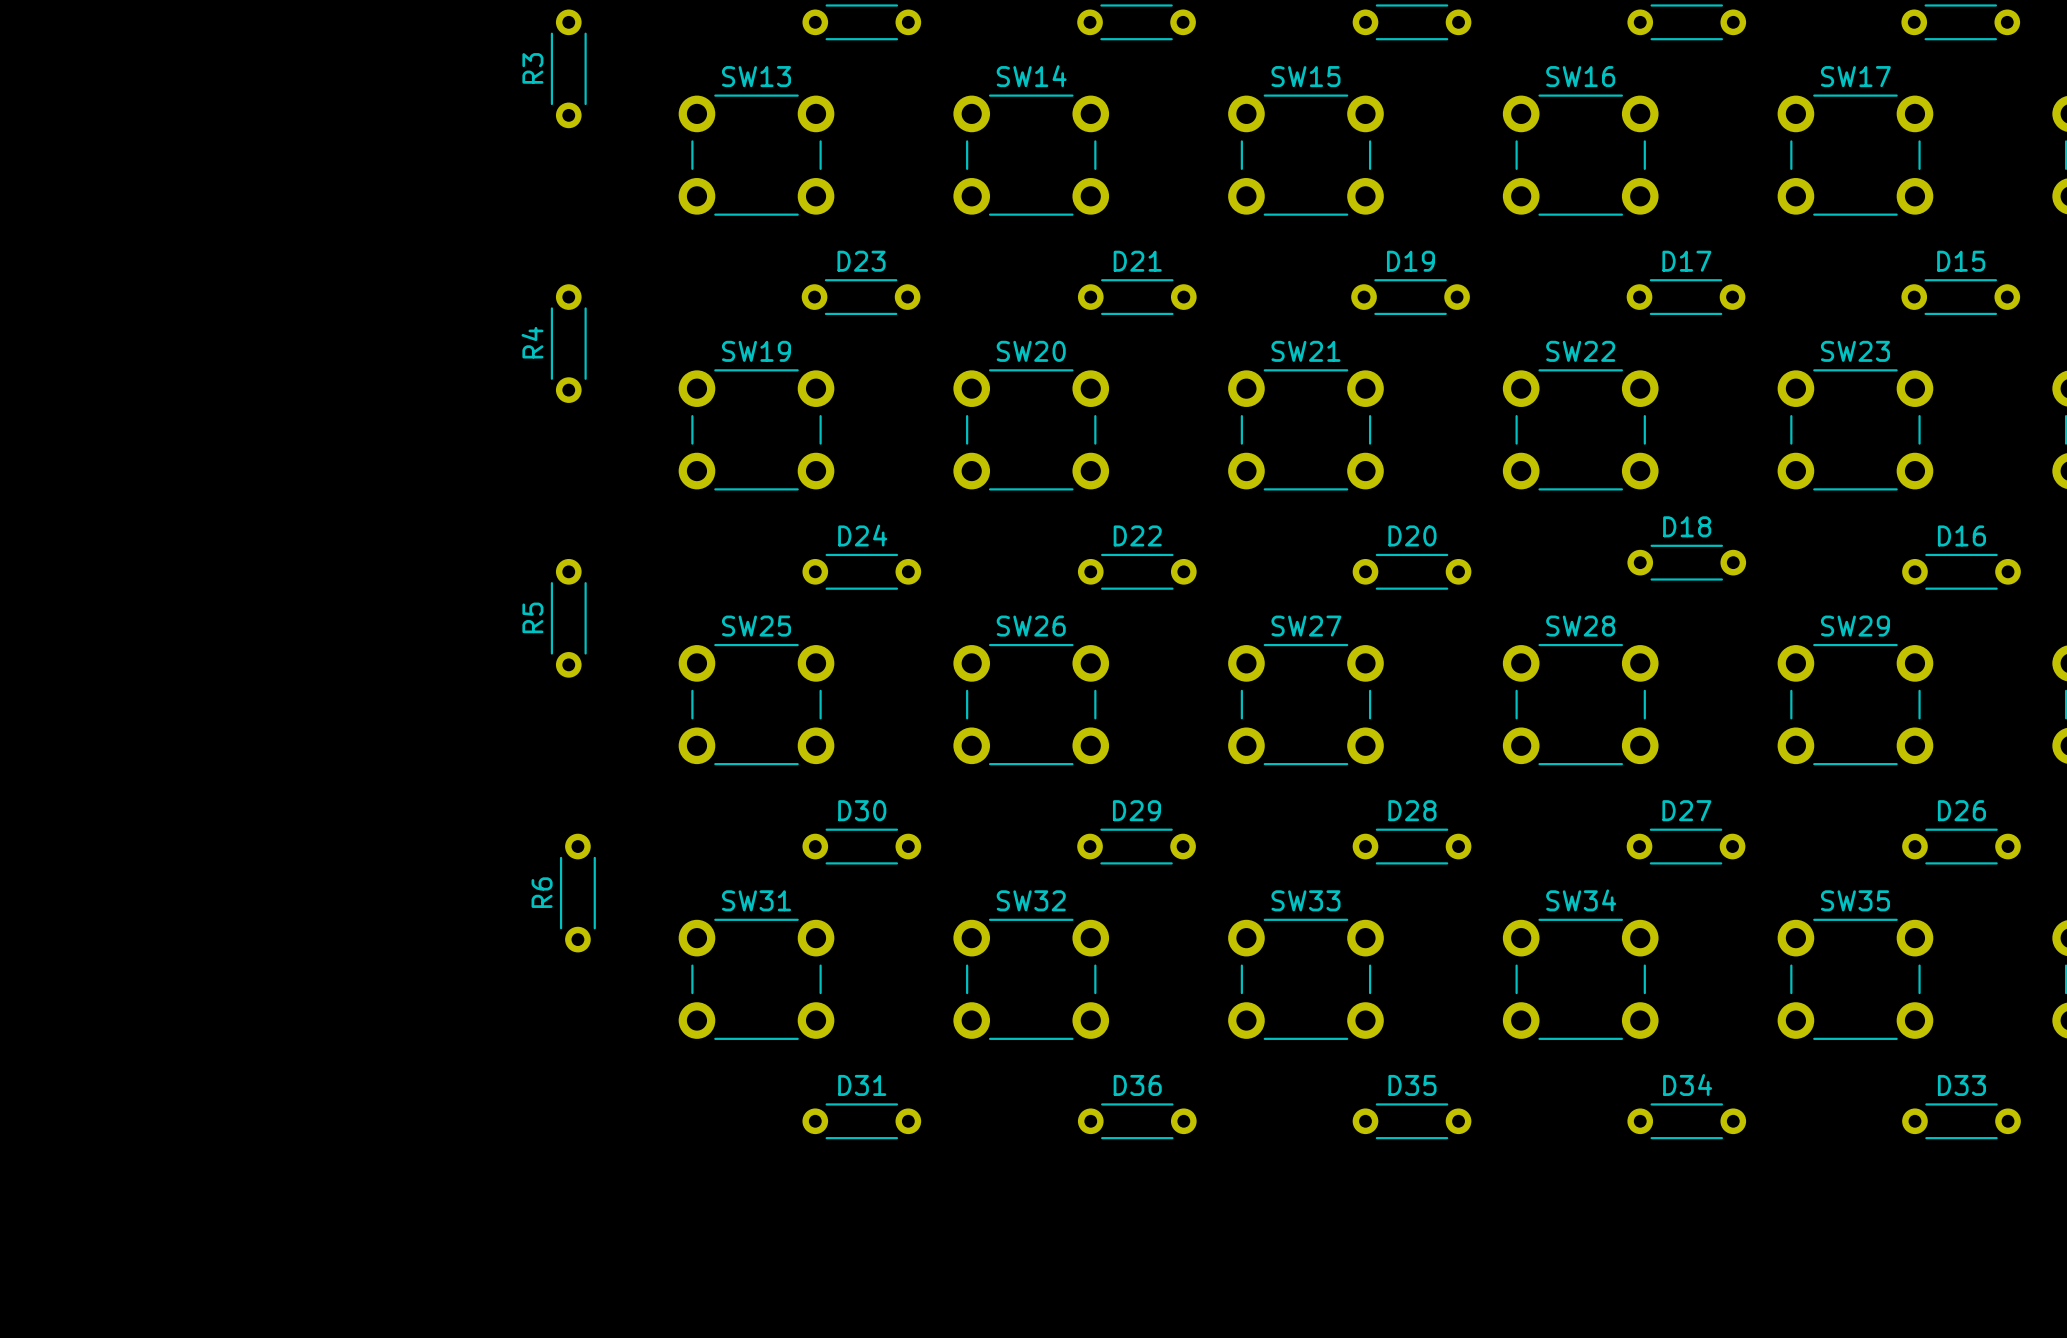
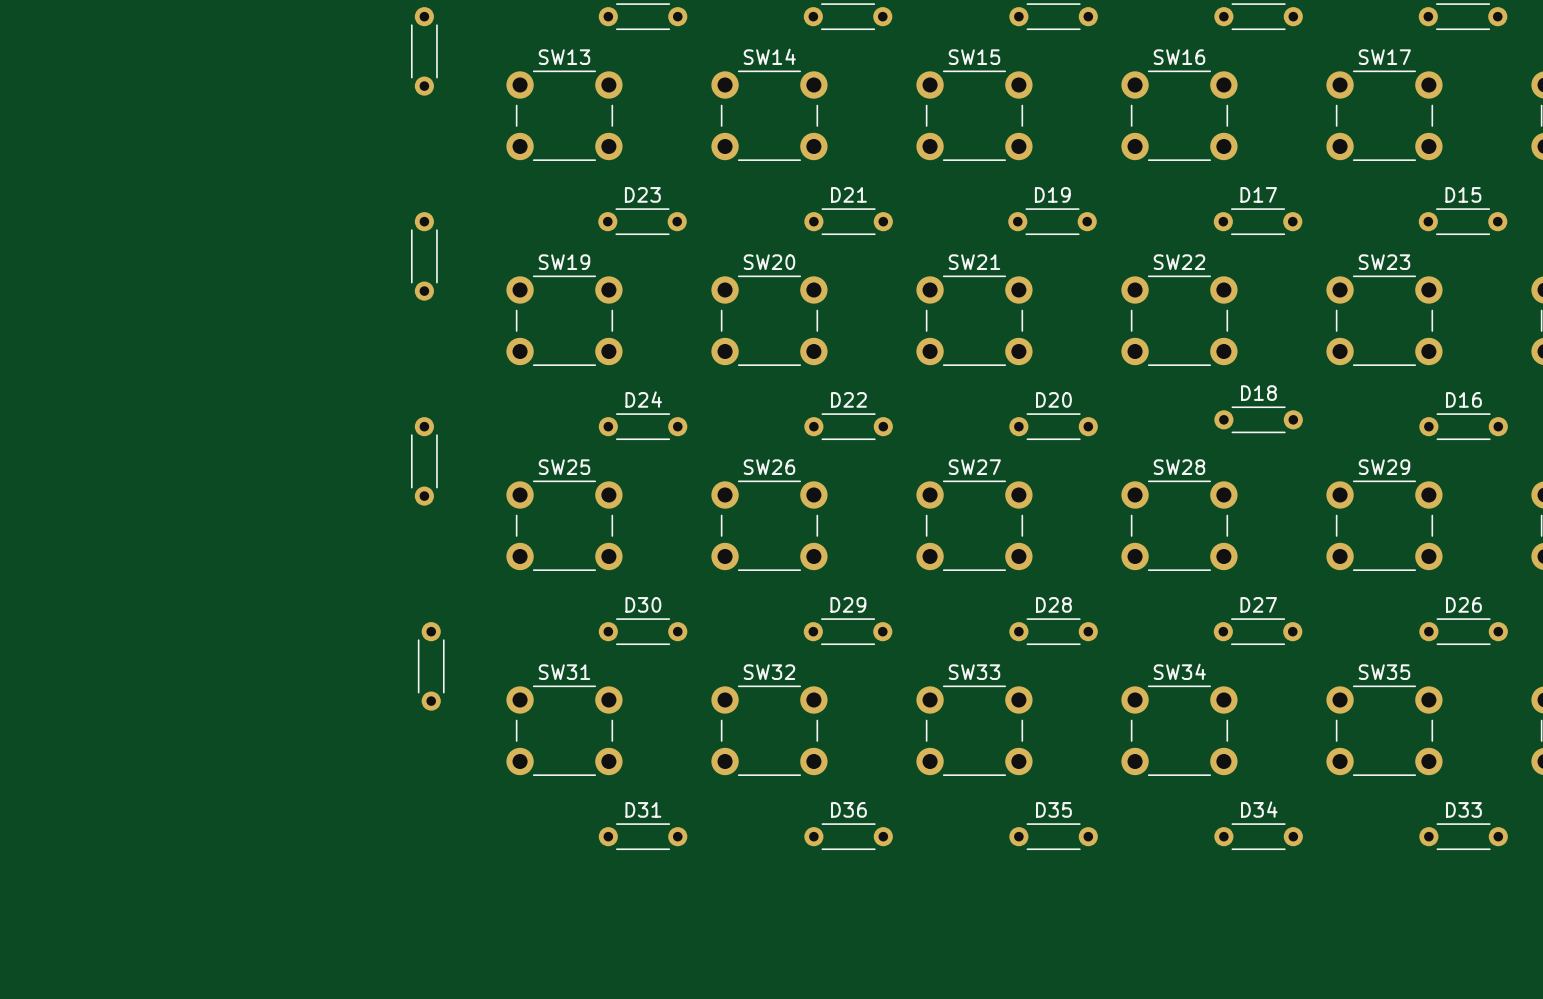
R3 name: R3 (532, 68) -> none
R4 name: R4 (532, 342) -> none
R5 name: R5 (532, 617) -> none
R6 name: R6 (542, 892) -> none

